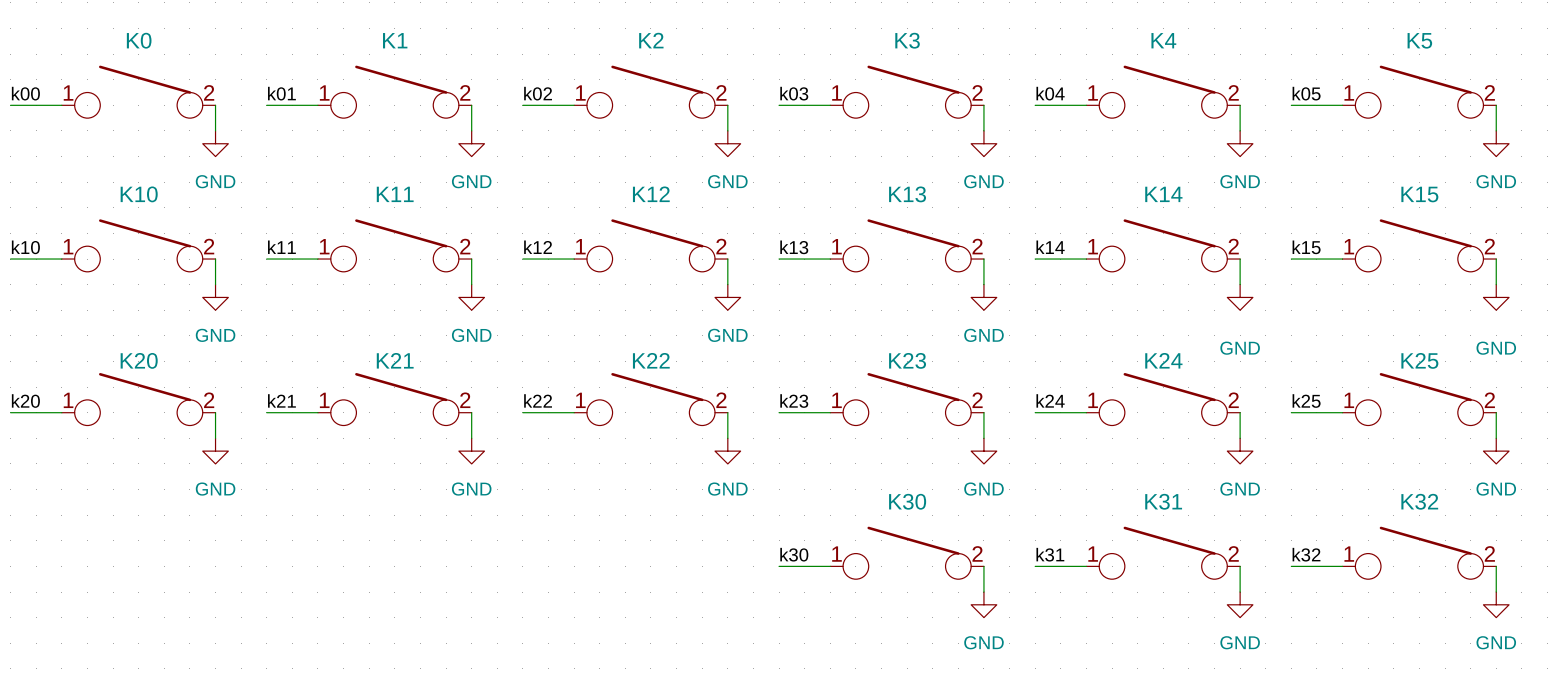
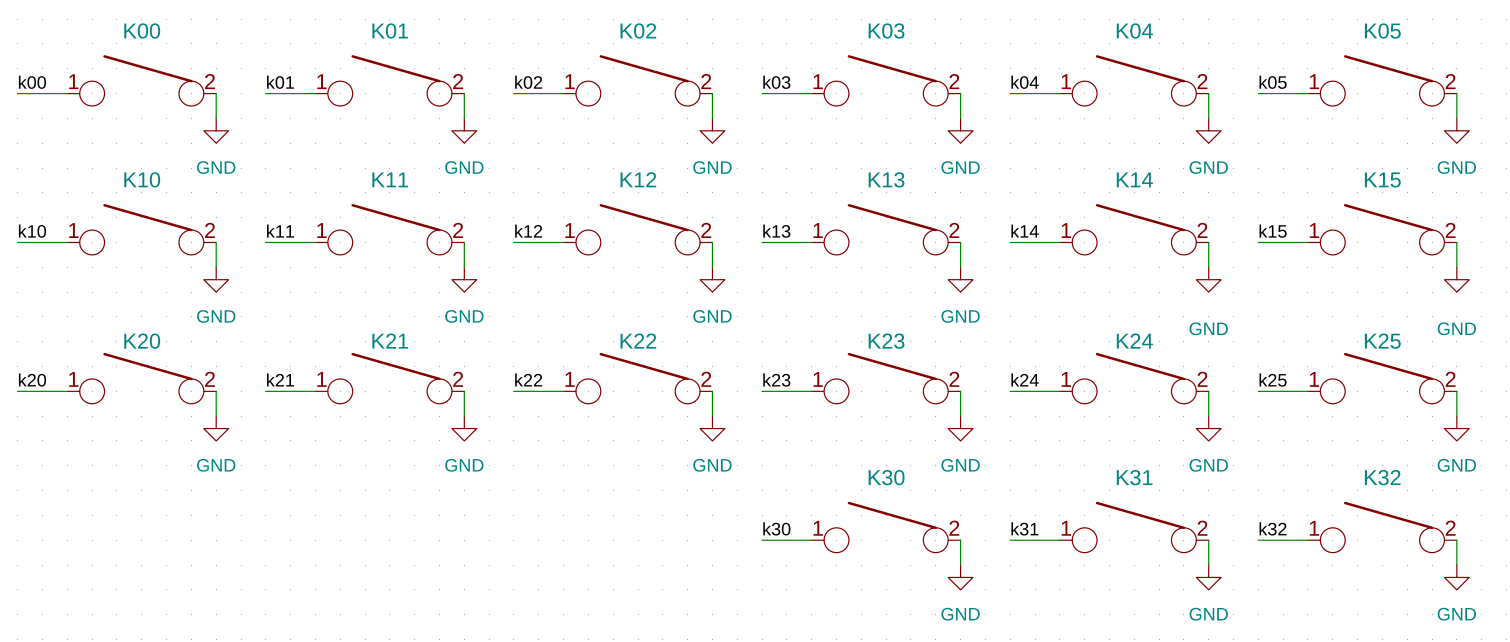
K0 name: K0 (139, 40) -> K00 (142, 31)
K1 name: K1 (395, 40) -> K01 (390, 31)
K2 name: K2 (651, 40) -> K02 (638, 31)
K3 name: K3 (907, 40) -> K03 (886, 31)
K4 name: K4 (1163, 40) -> K04 (1134, 31)
K5 name: K5 (1419, 40) -> K05 (1382, 31)

